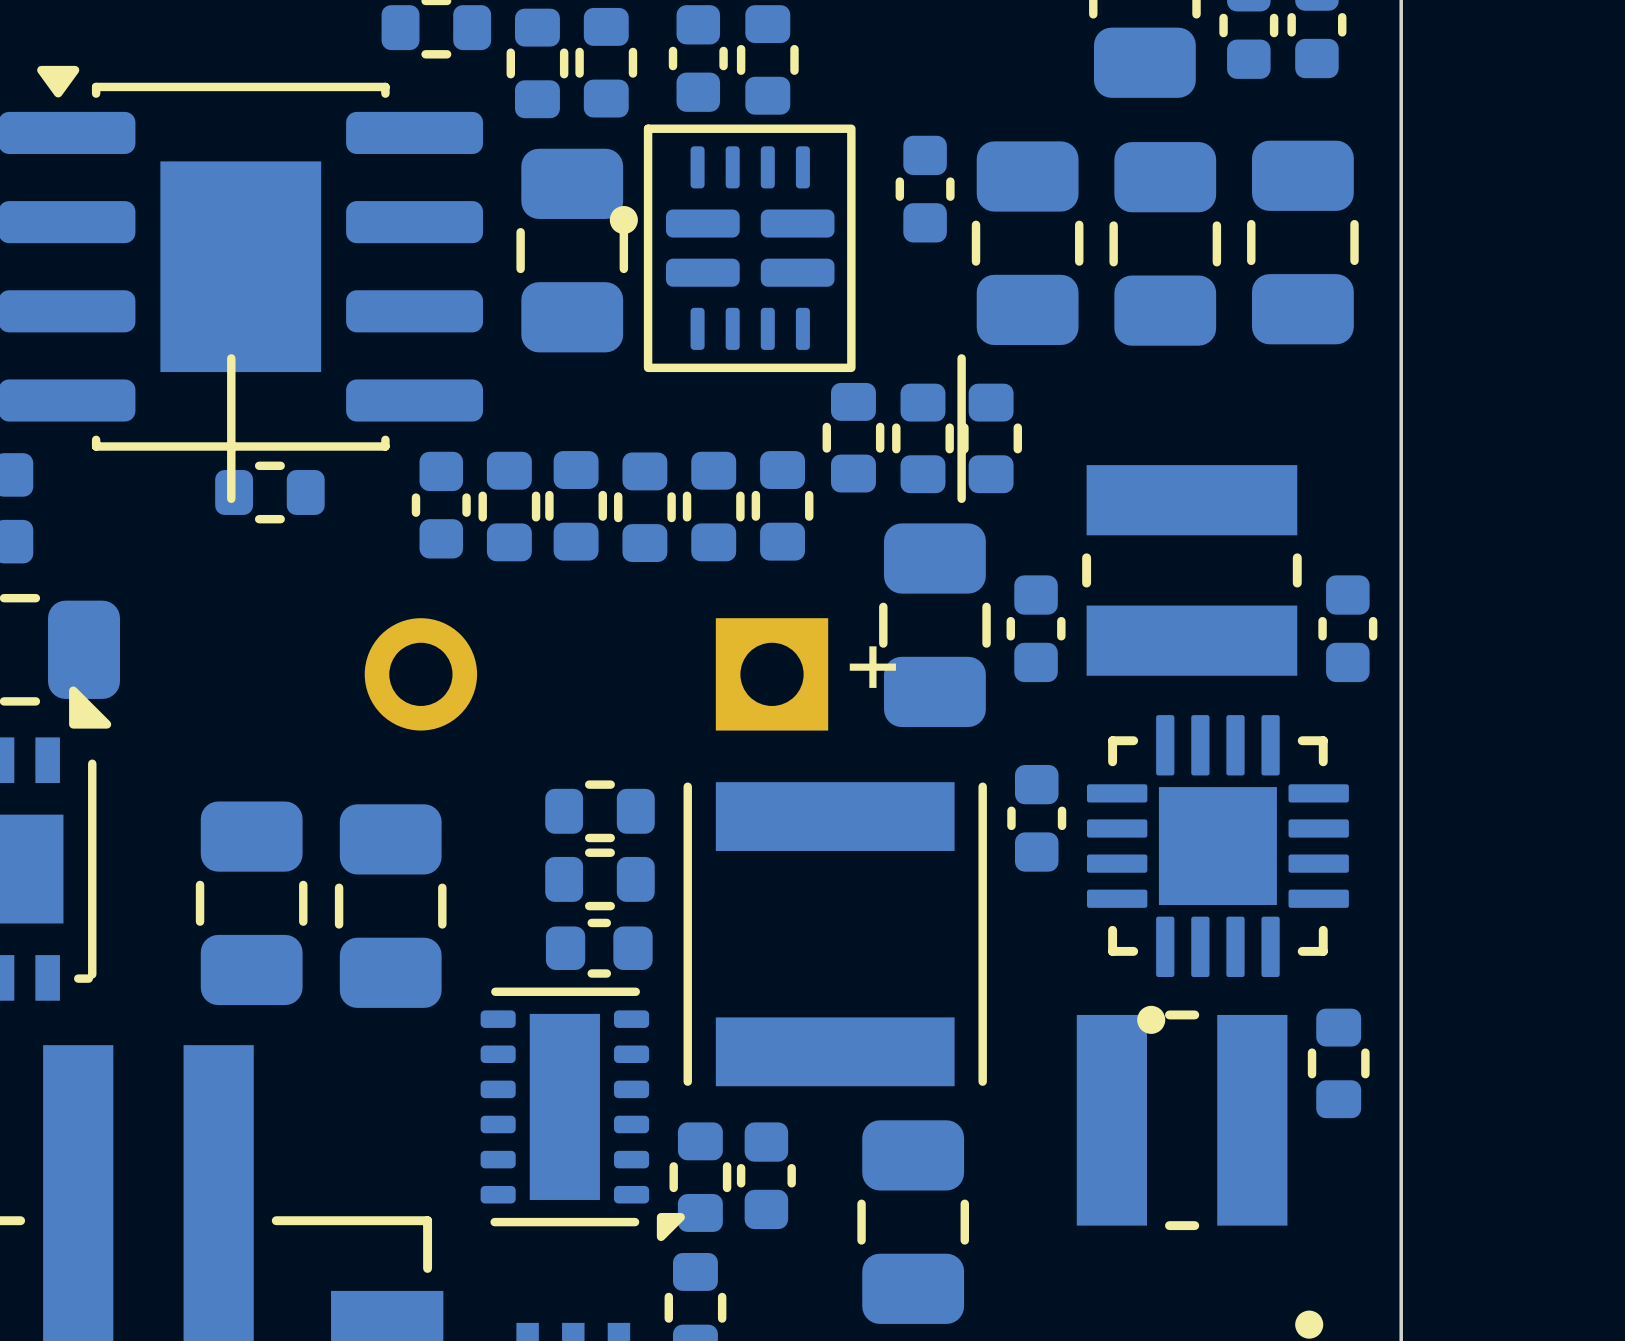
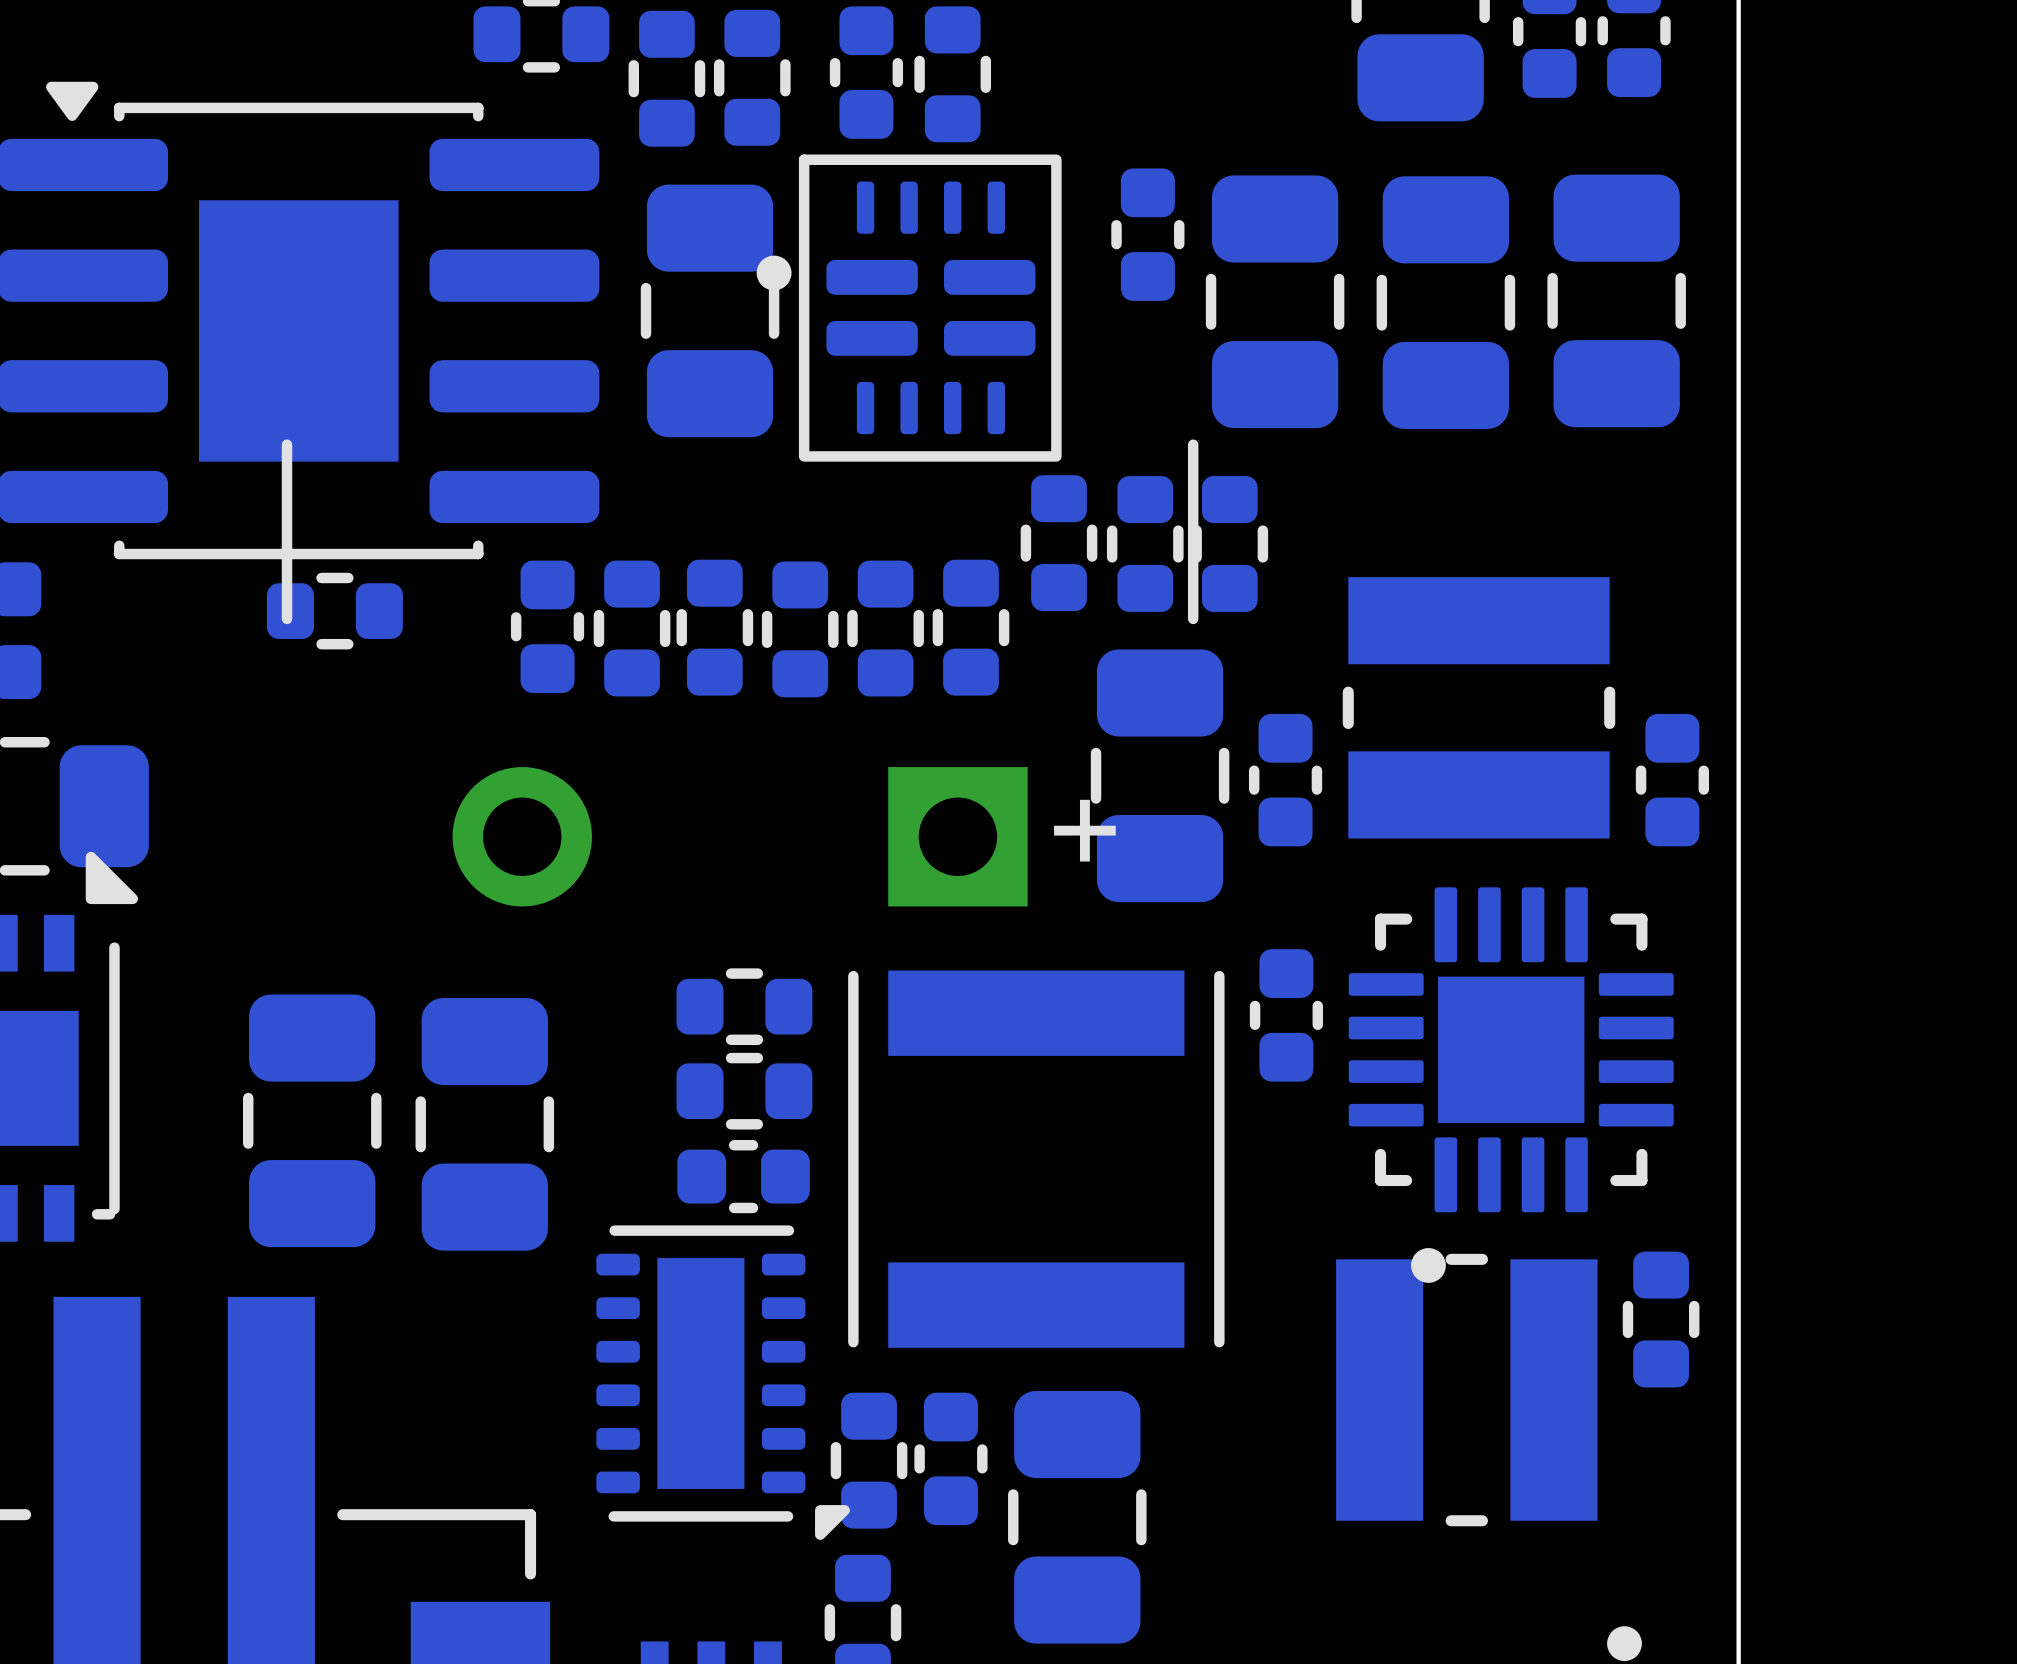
part position: (913, 1222) -> (1077, 1517)

